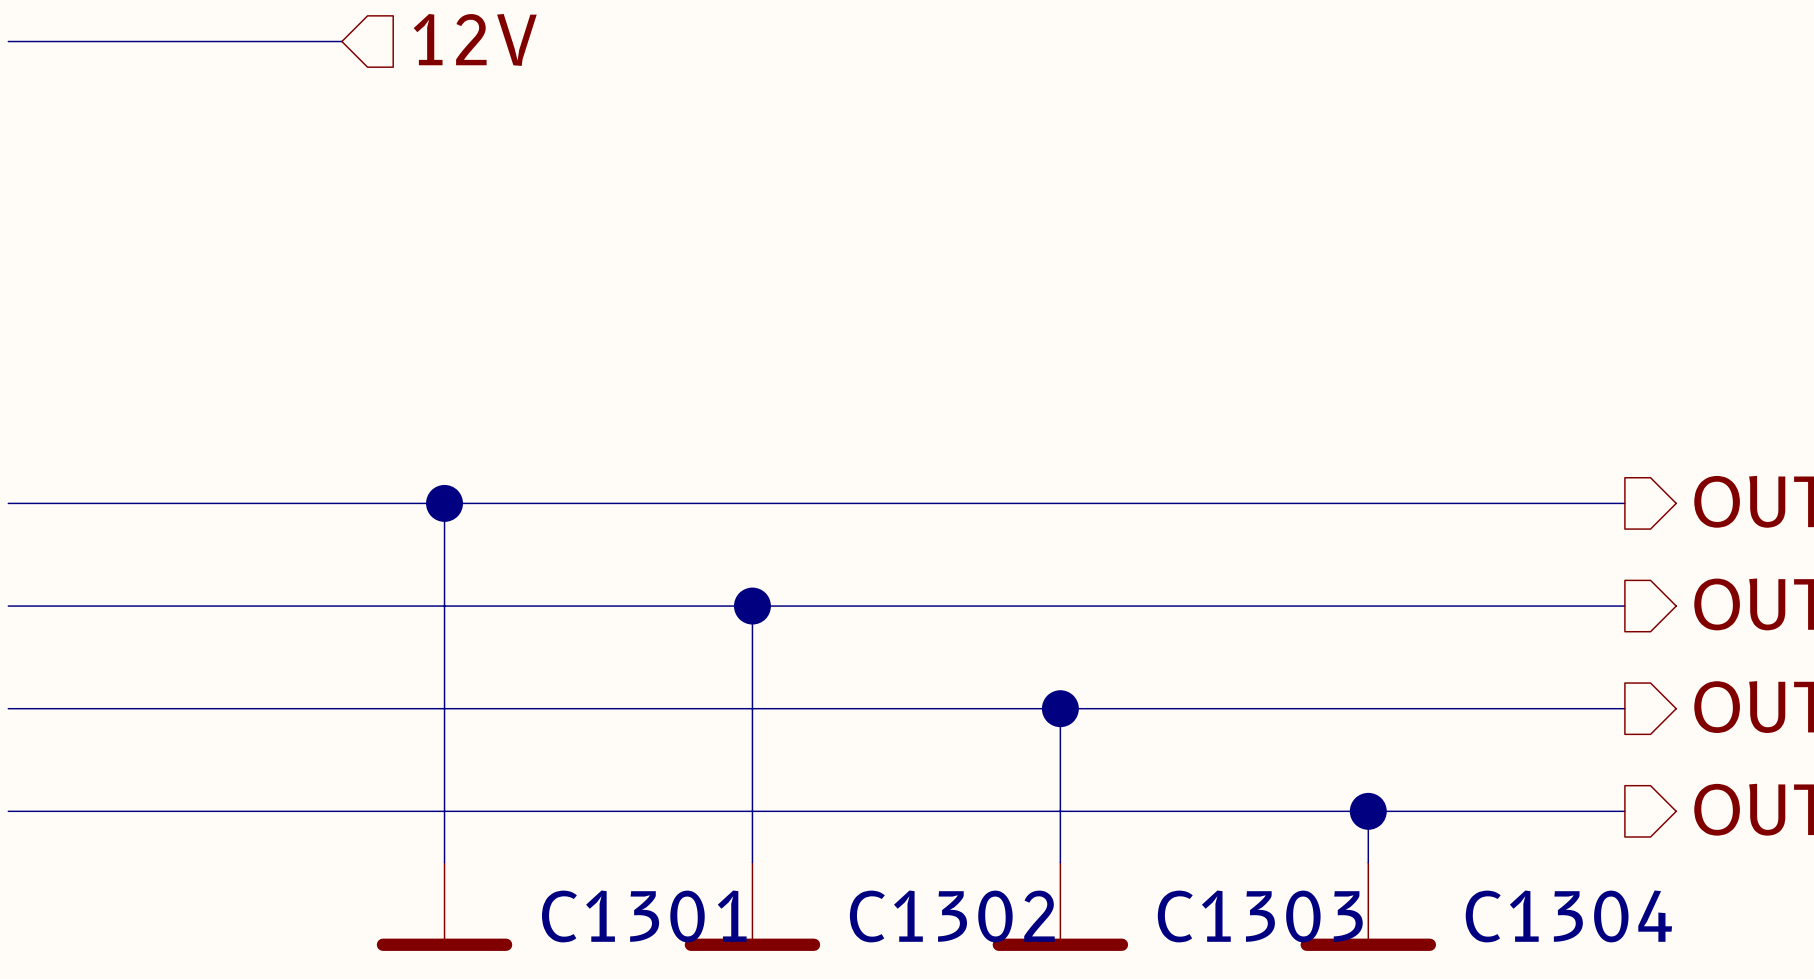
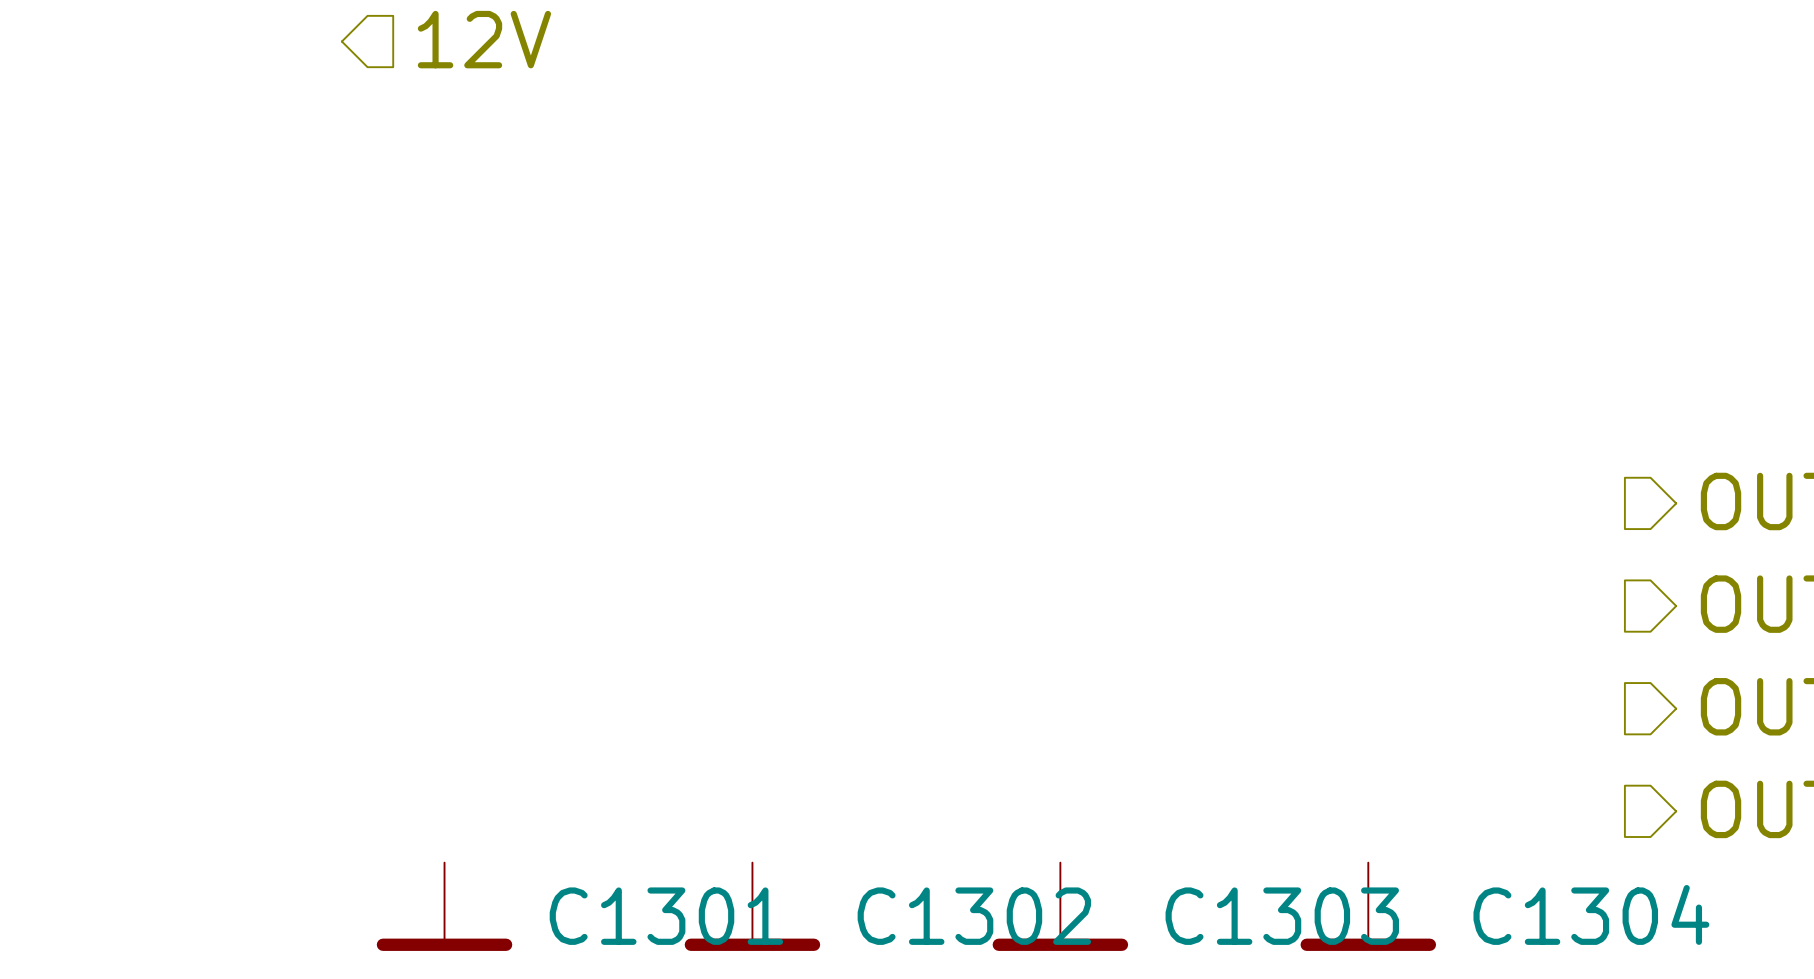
wire: (8, 41) (341, 41) -> none
wire: (8, 503) (1624, 503) -> none
wire: (444, 503) (444, 862) -> none
junction: (444, 503) -> none
wire: (8, 606) (1624, 606) -> none
wire: (752, 606) (752, 862) -> none
junction: (752, 606) -> none
wire: (8, 708) (1624, 708) -> none
wire: (1060, 708) (1060, 862) -> none
junction: (1060, 708) -> none
wire: (8, 811) (1624, 811) -> none
wire: (1368, 811) (1368, 862) -> none
junction: (1368, 811) -> none

